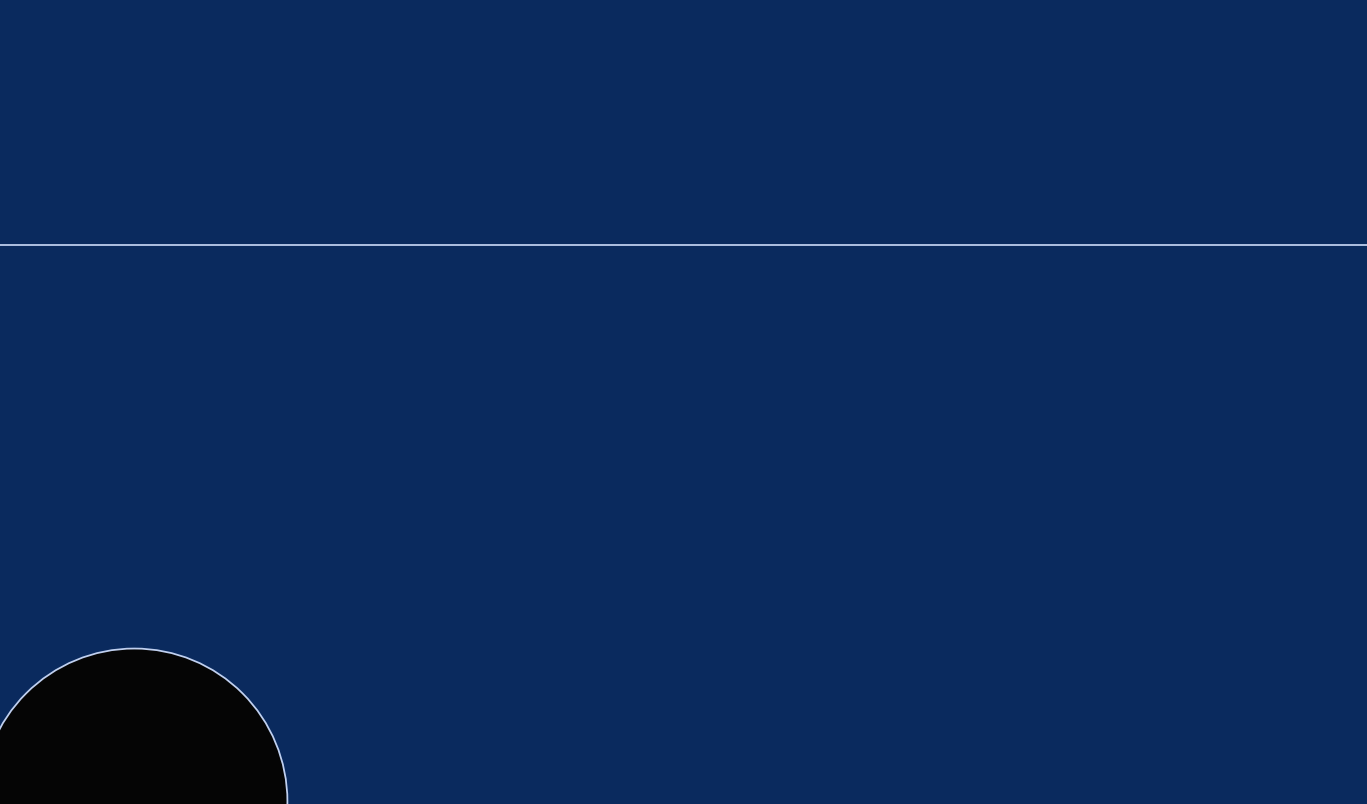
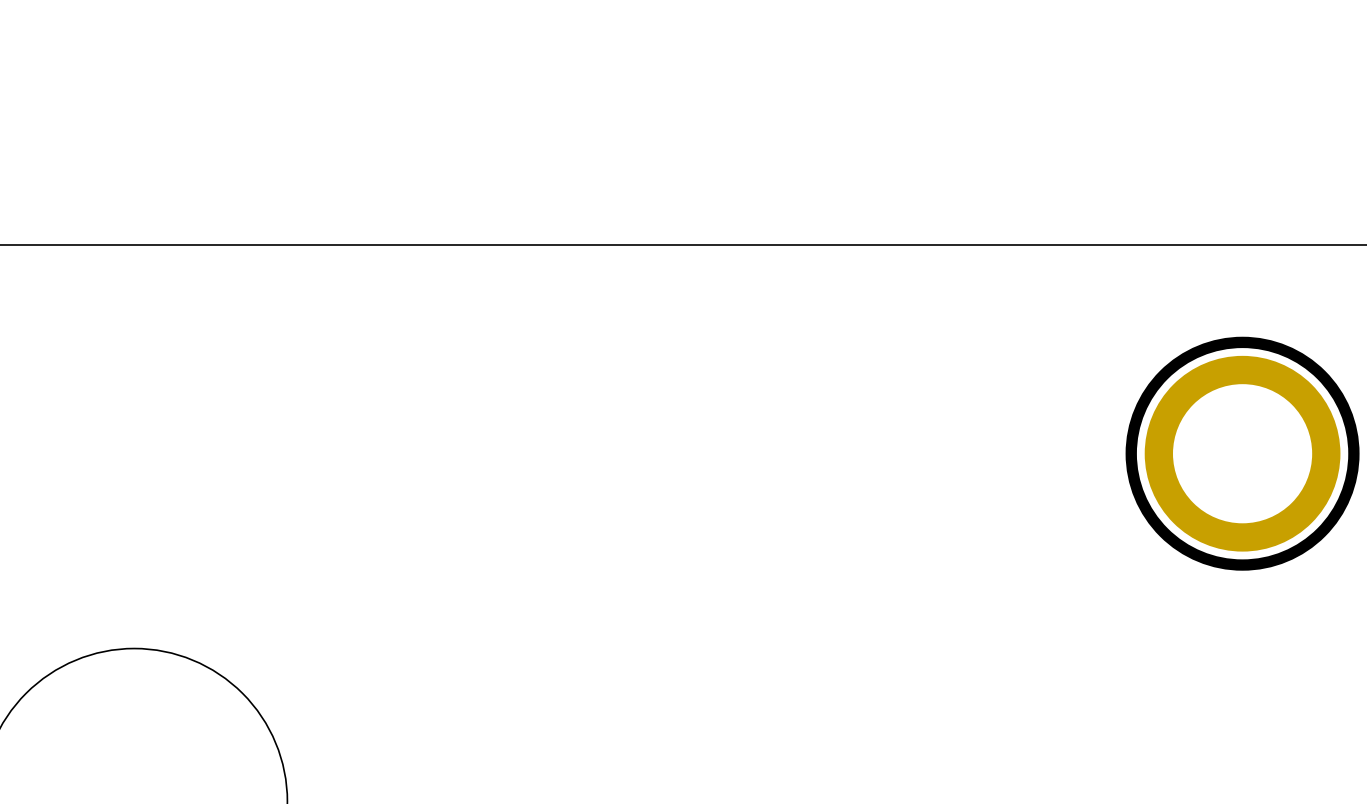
part: none -> (1242, 453)

